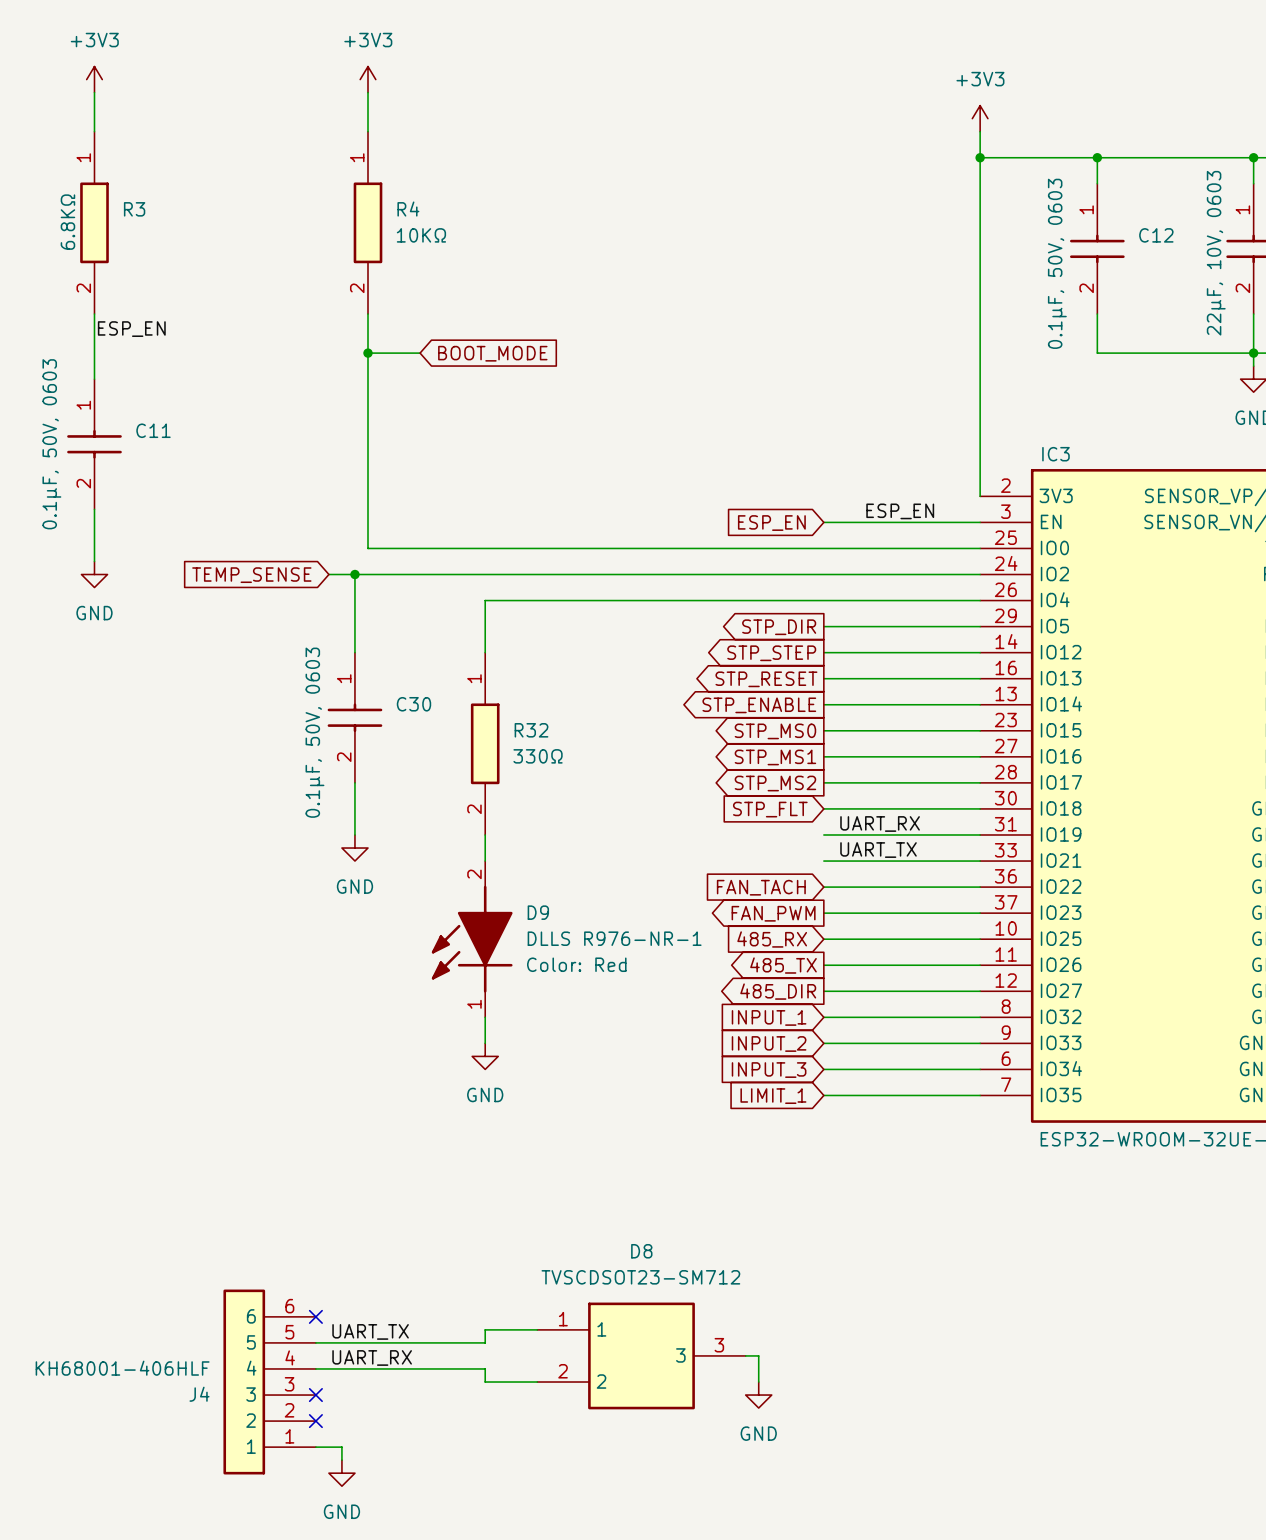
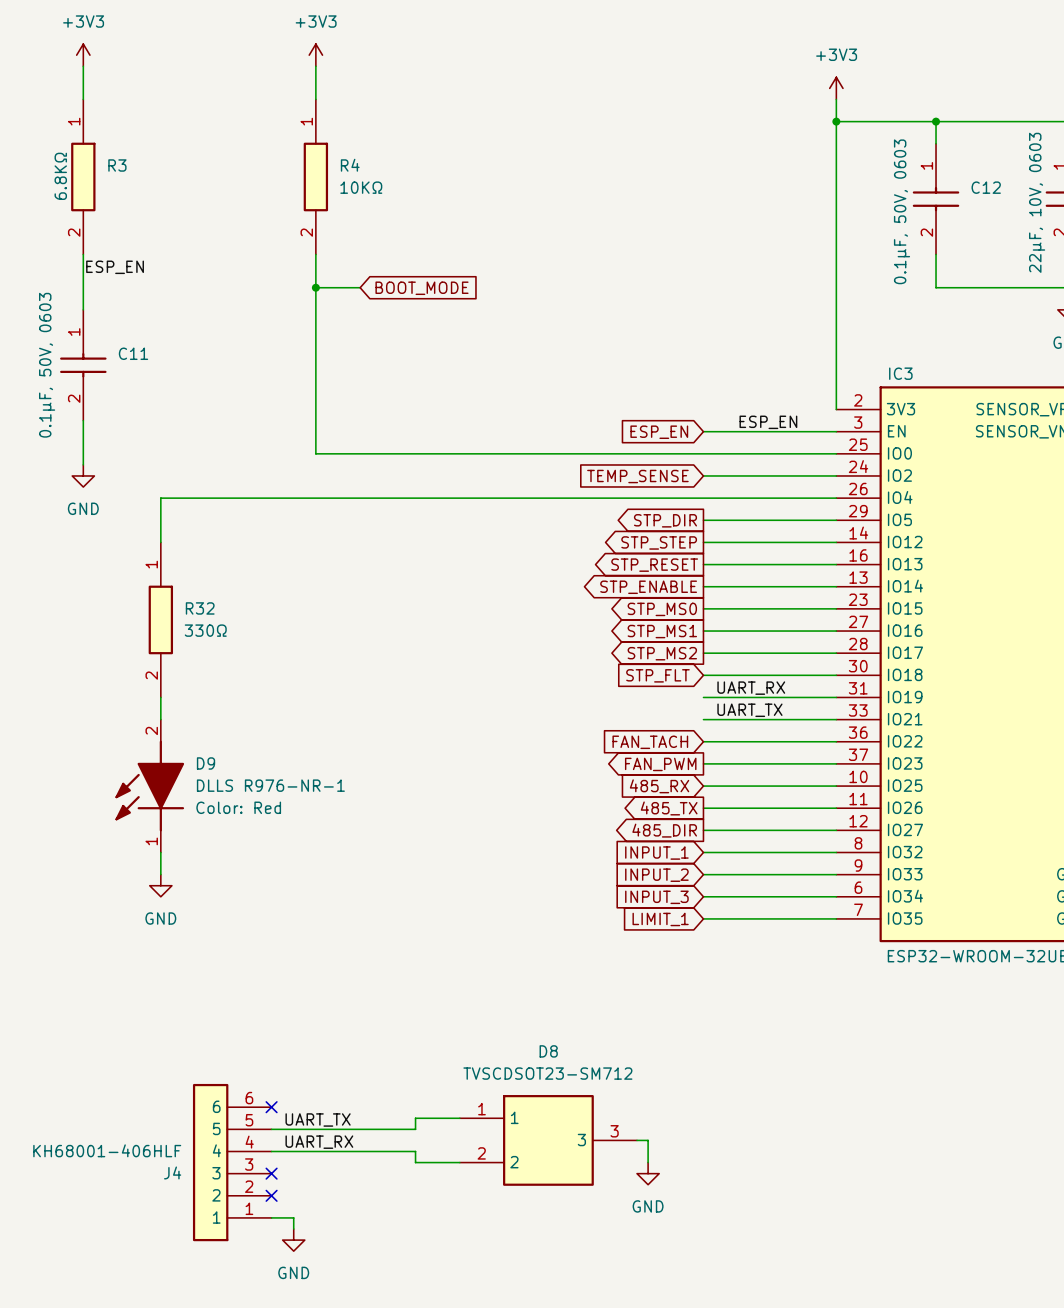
wire: (328, 574) (823, 574) -> none
wire: (354, 574) (354, 652) -> none
junction: (354, 574) -> none
global label: TEMP_SENSE (251, 575) -> none
global label: none -> TEMP_SENSE (637, 476)
wire: (485, 600) (485, 652) -> (415, 498) (160, 498) (160, 542)
C30: (354, 717) -> none
R32 position: (485, 743) -> (160, 619)
wire: (354, 782) (354, 834) -> none
wire: none -> (160, 697) (160, 719)
wire: (485, 834) (485, 861) -> none
power symbol: GND (354, 848) -> none
D9 position: (472, 939) -> (149, 786)
wire: none -> (160, 852) (160, 874)
wire: (485, 1017) (485, 1043) -> none
power symbol: none -> GND (160, 885)
power symbol: GND (485, 1056) -> none

